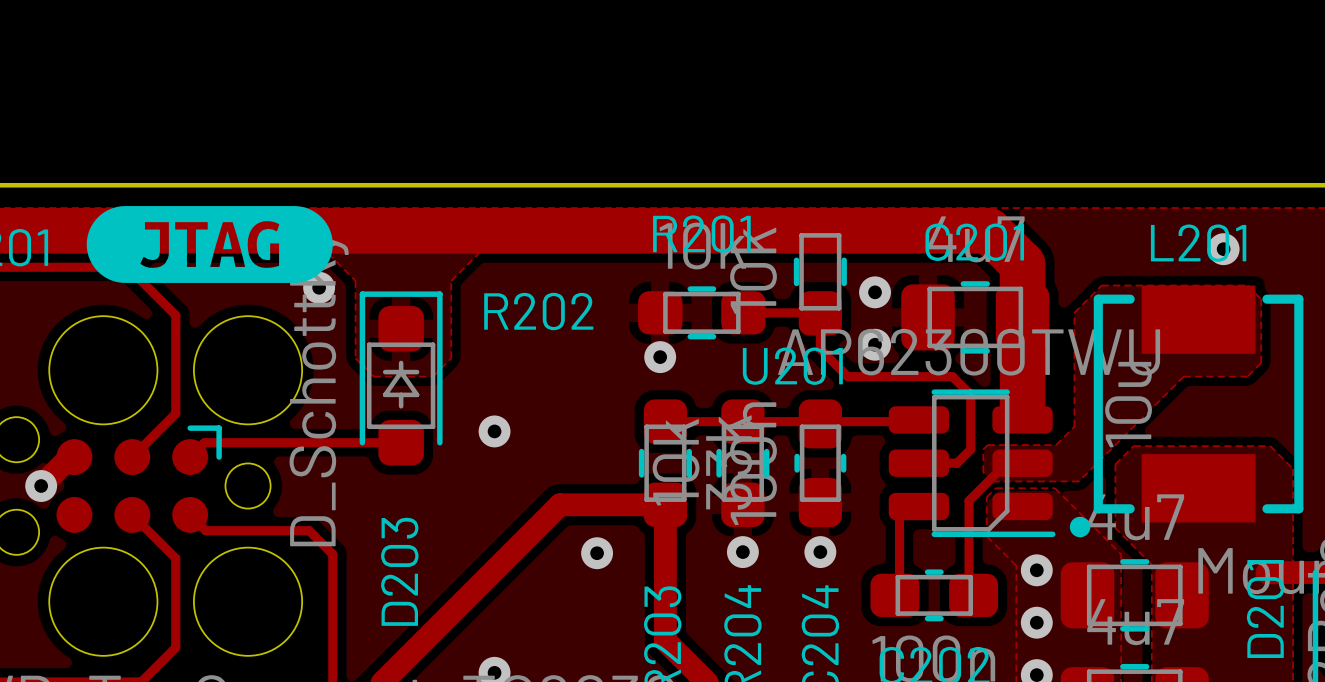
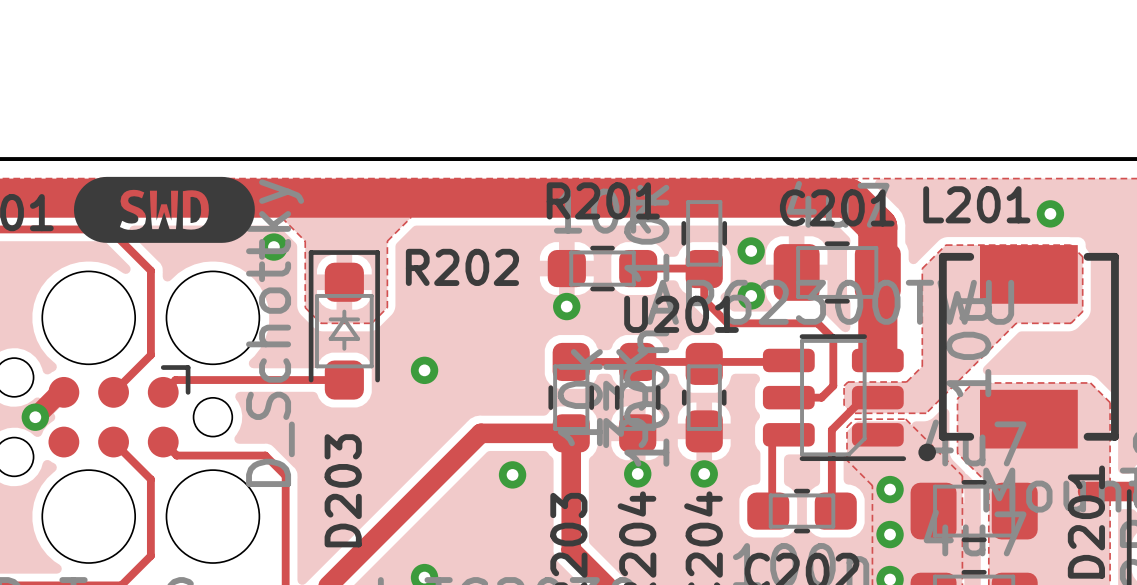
drawing shape: [86, 206, 333, 283] -> [73, 176, 255, 243]
L201 name position: L201 (1198, 243) -> L201 (976, 204)

